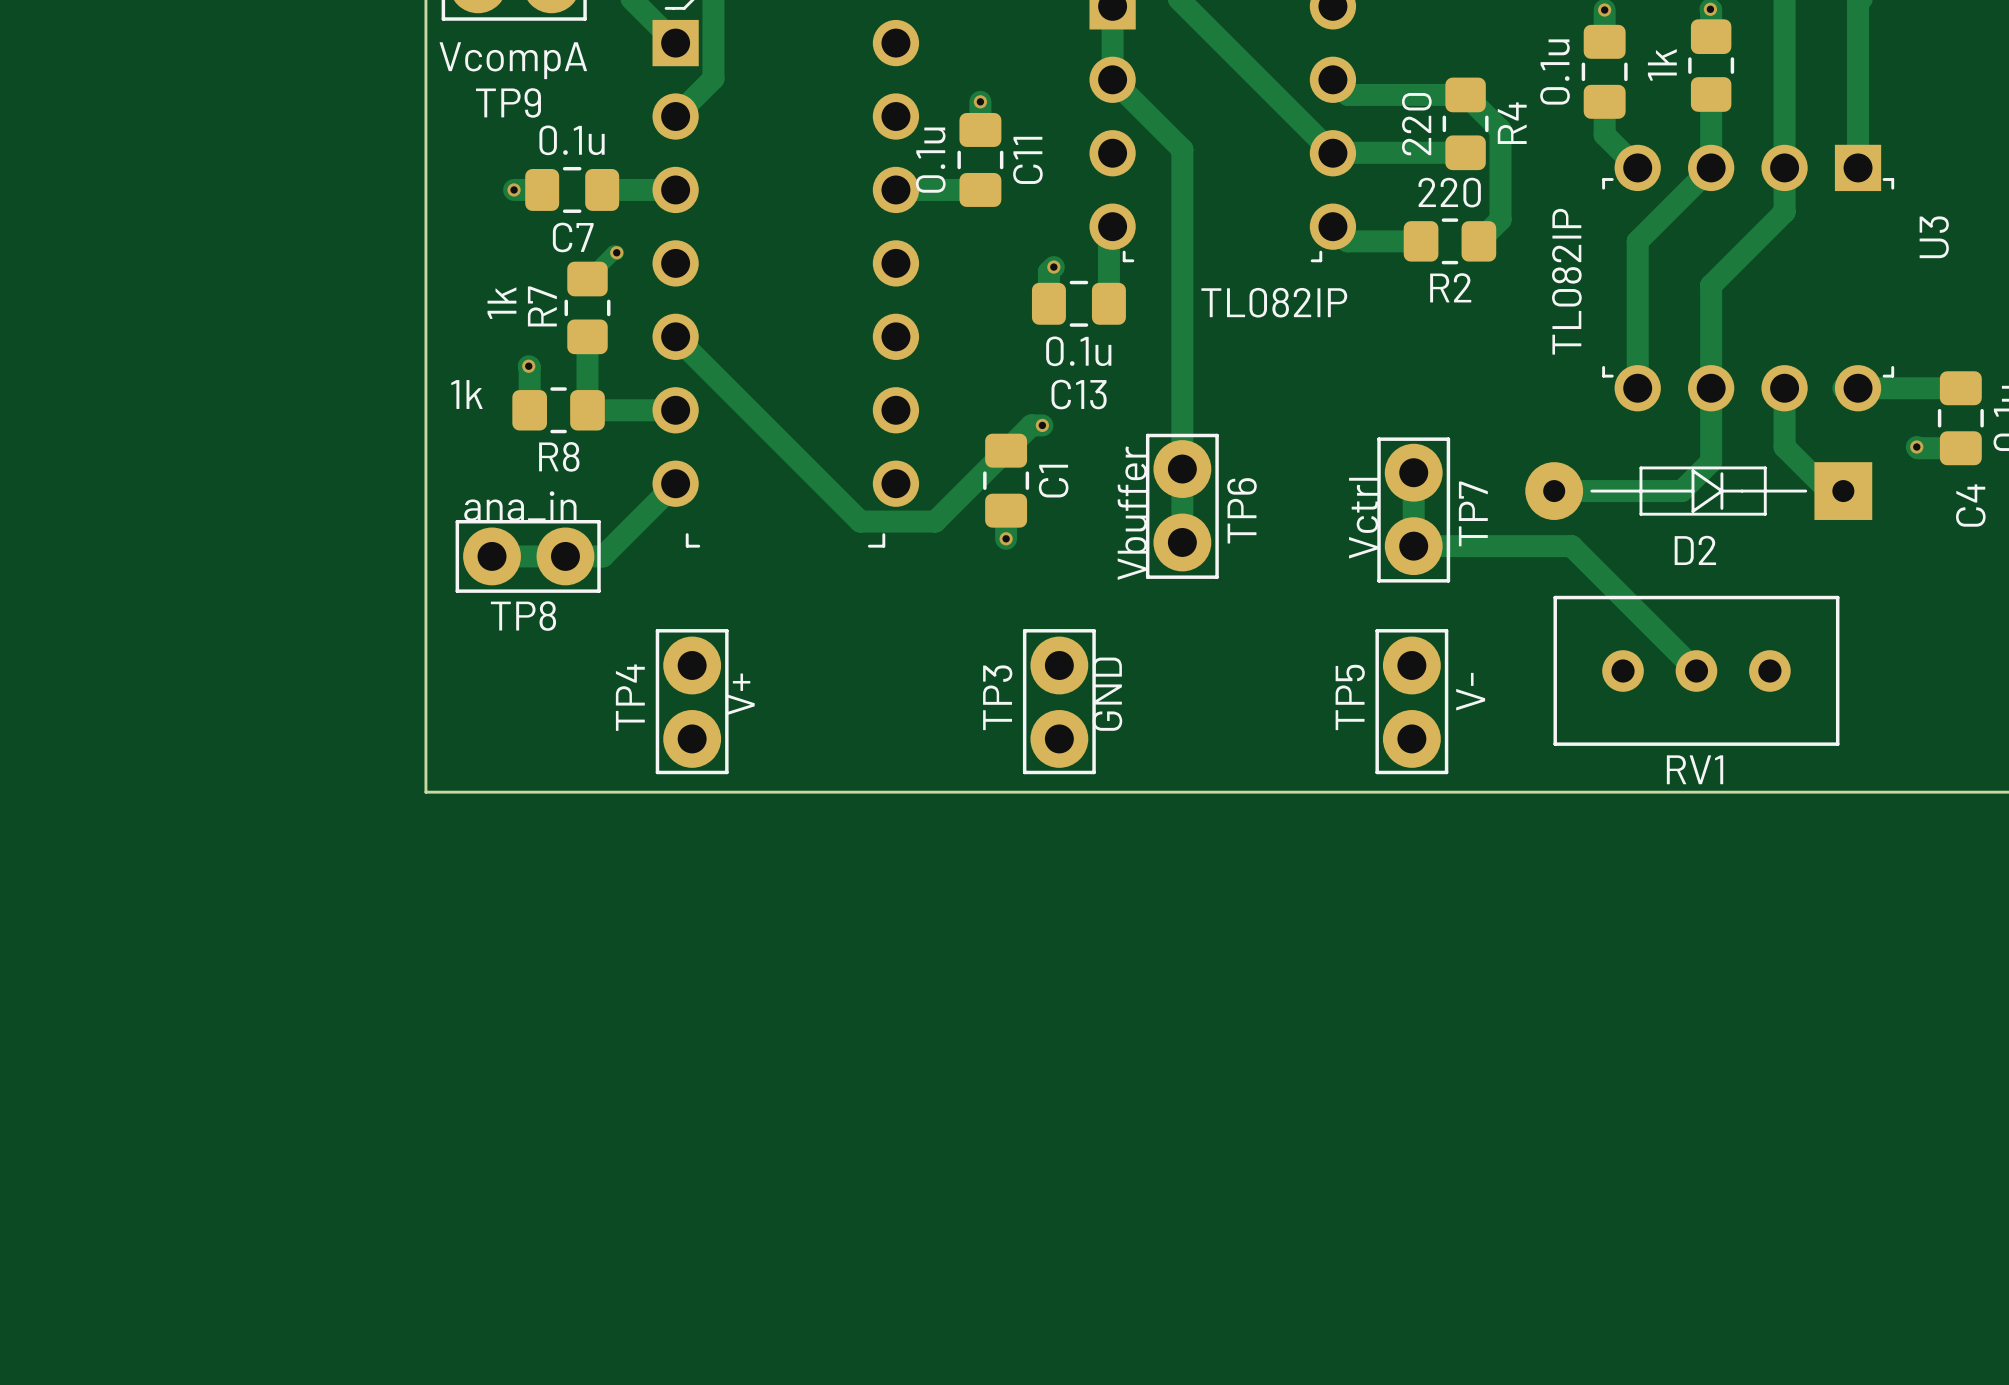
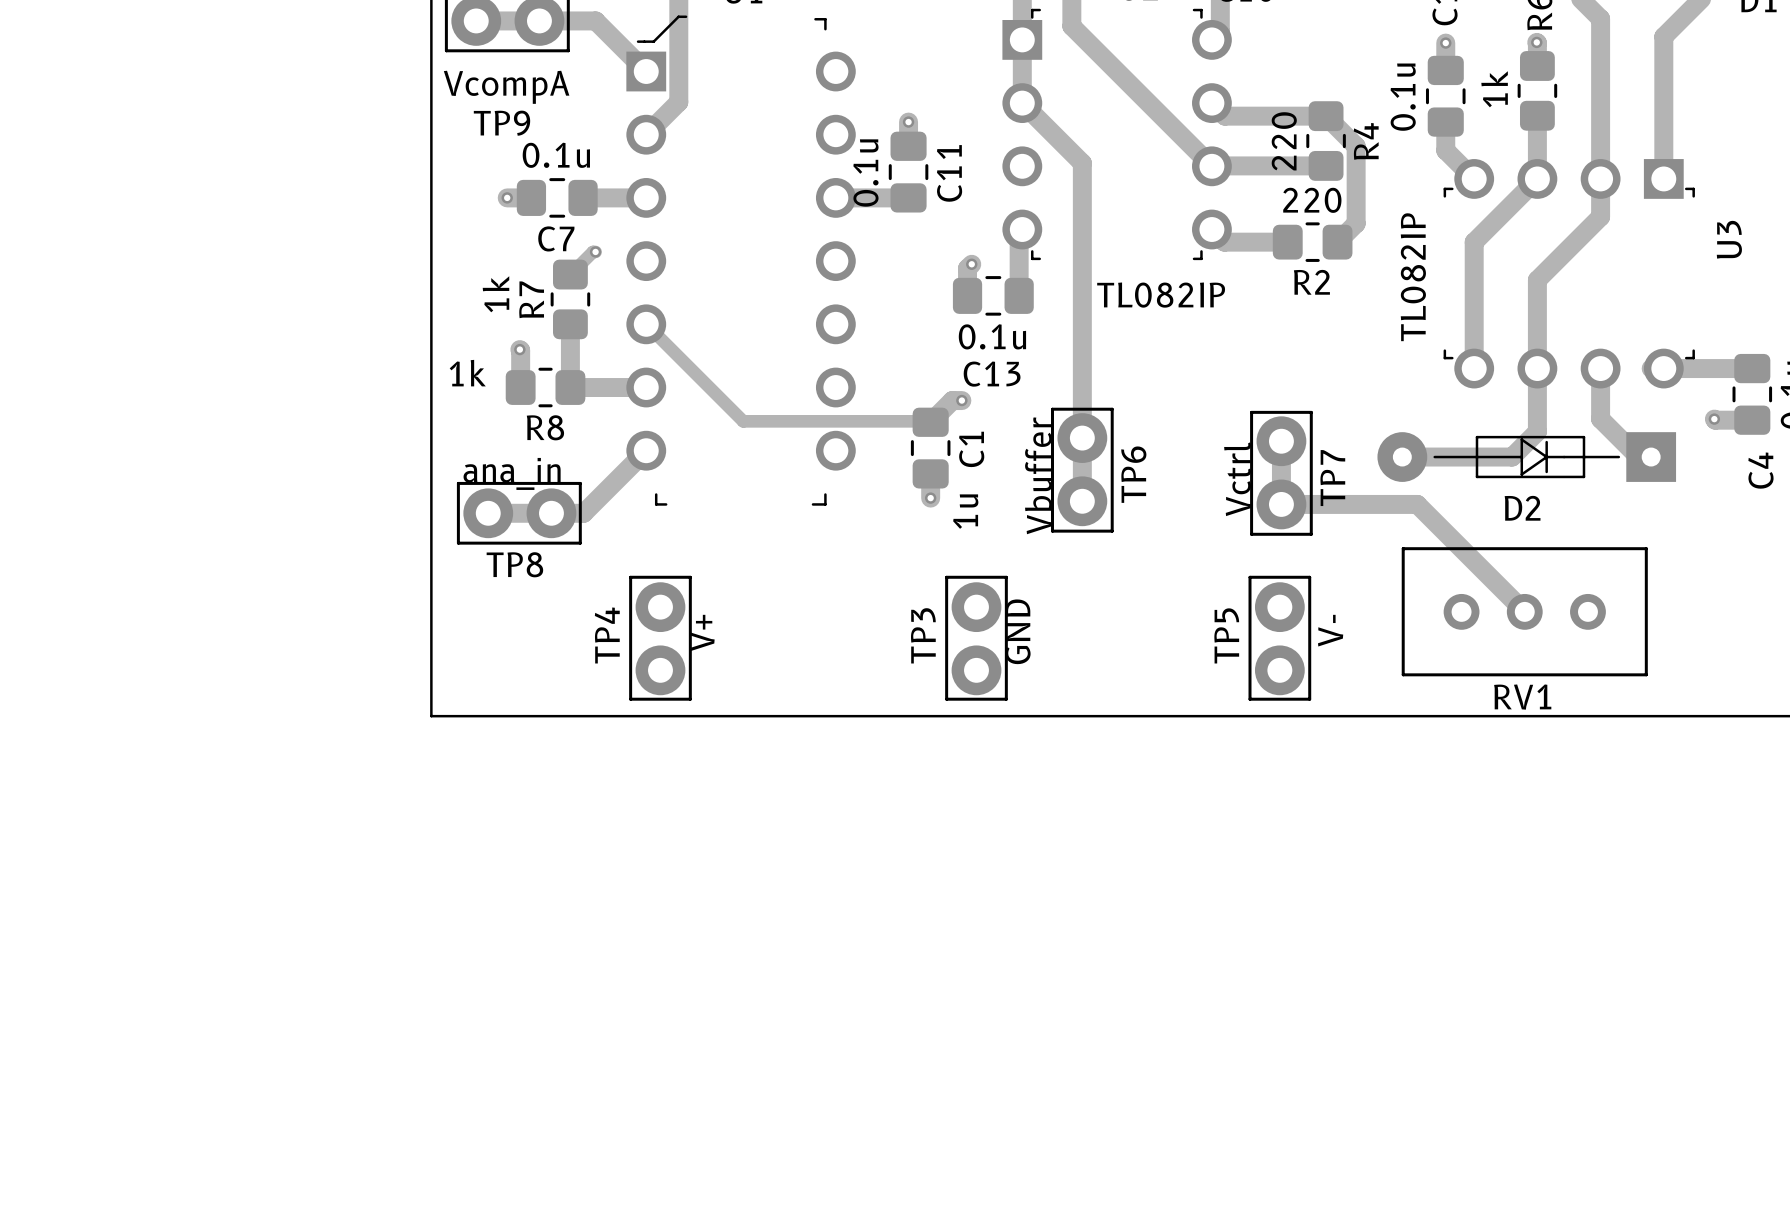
track width: thick (675, 336) (788, 449) -> thin (646, 324) (743, 421)
track: (788, 449) (860, 521) (935, 521) (1006, 450) -> (743, 421) (930, 422)
C1 value: none -> 1u (965, 511)

